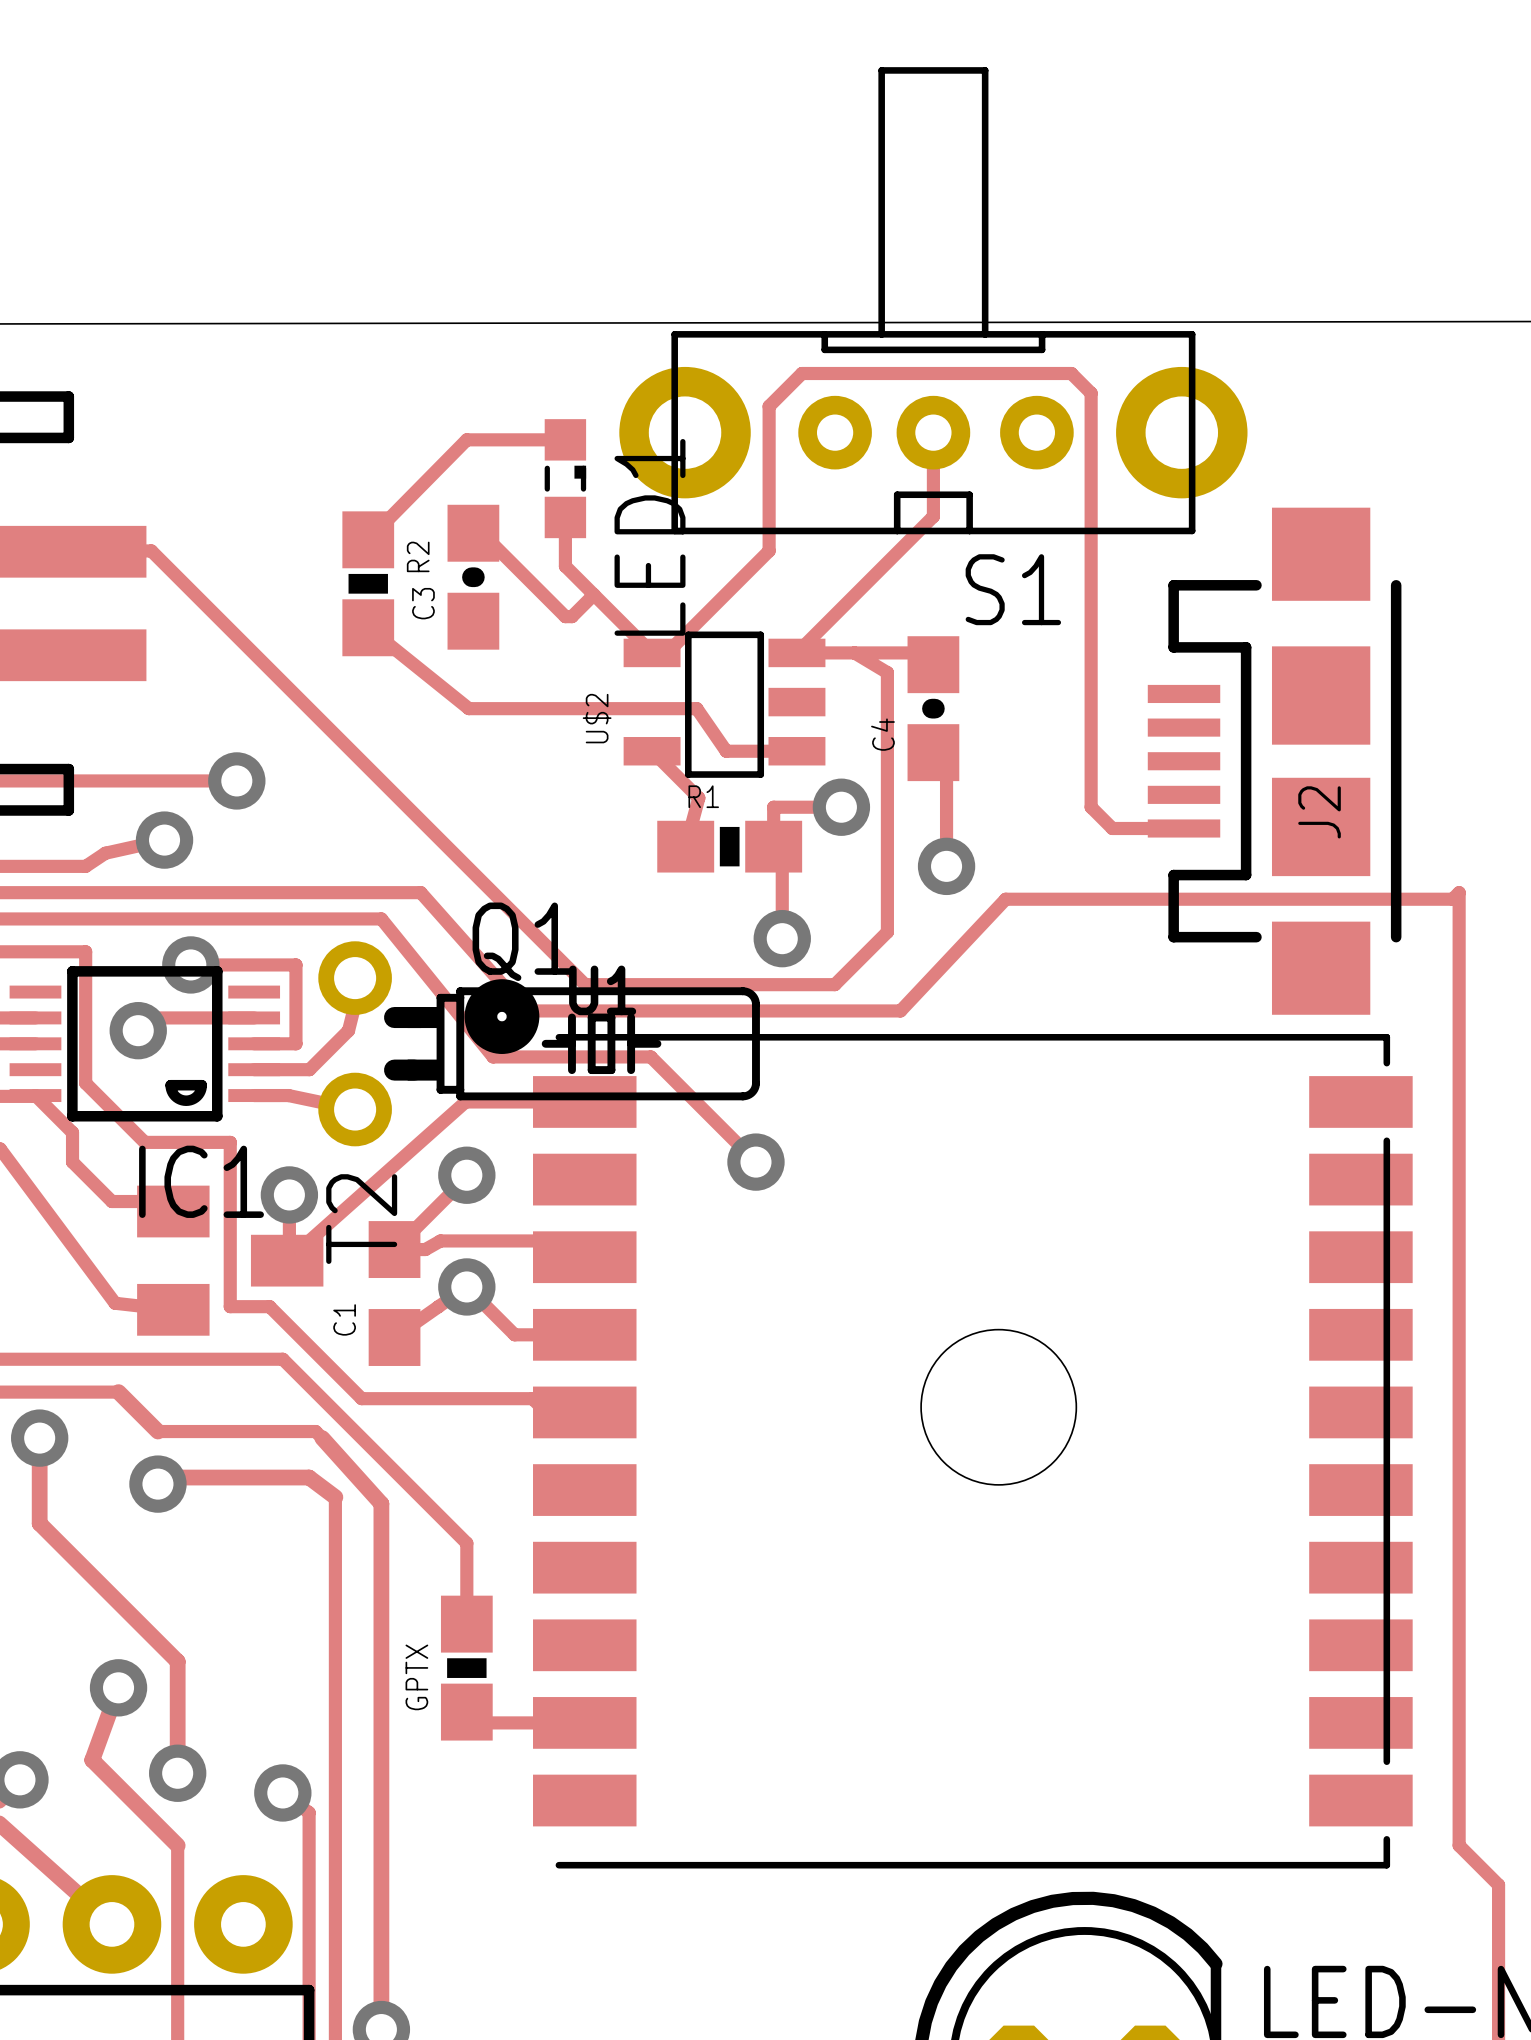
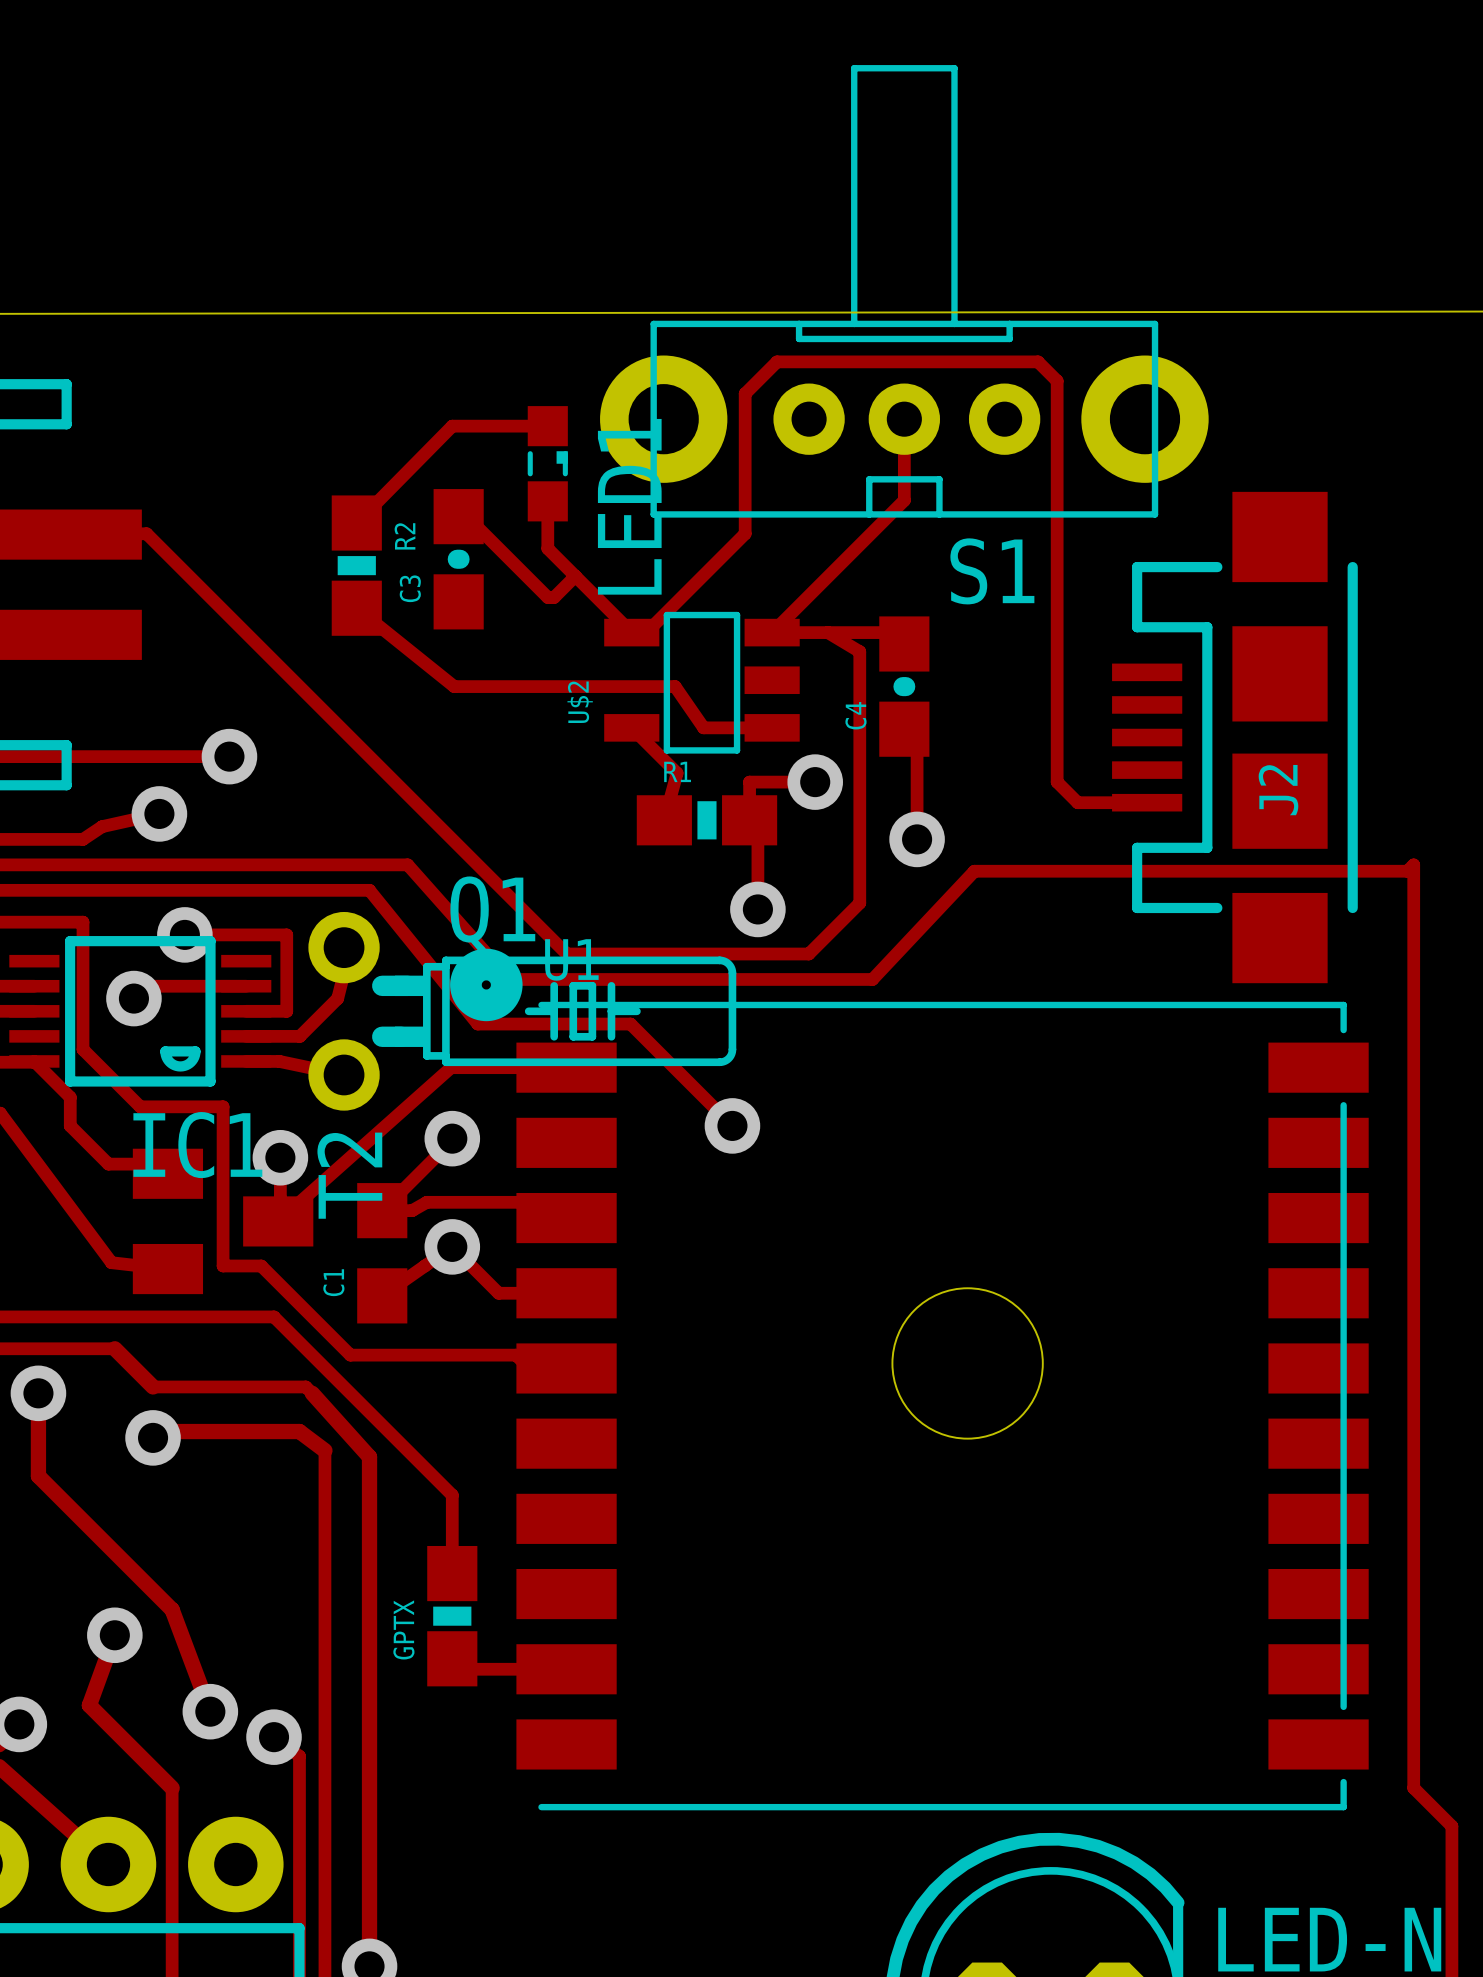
track: (177, 1661) (177, 1773) -> (172, 1609) (210, 1711)
via position: (177, 1773) -> (210, 1711)

